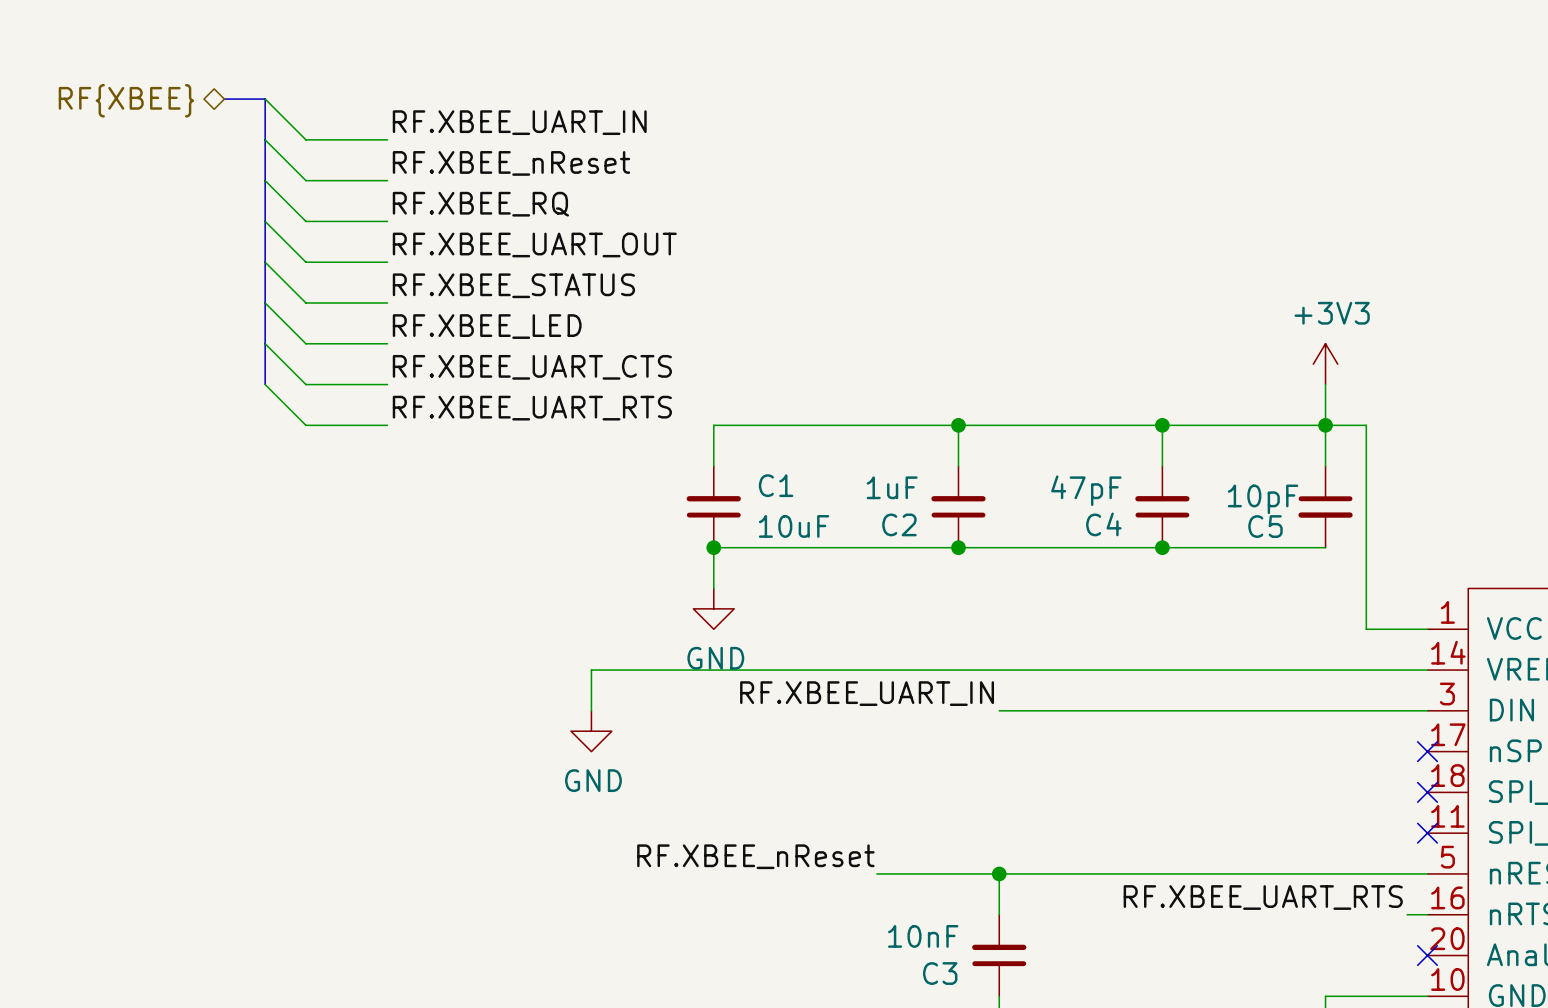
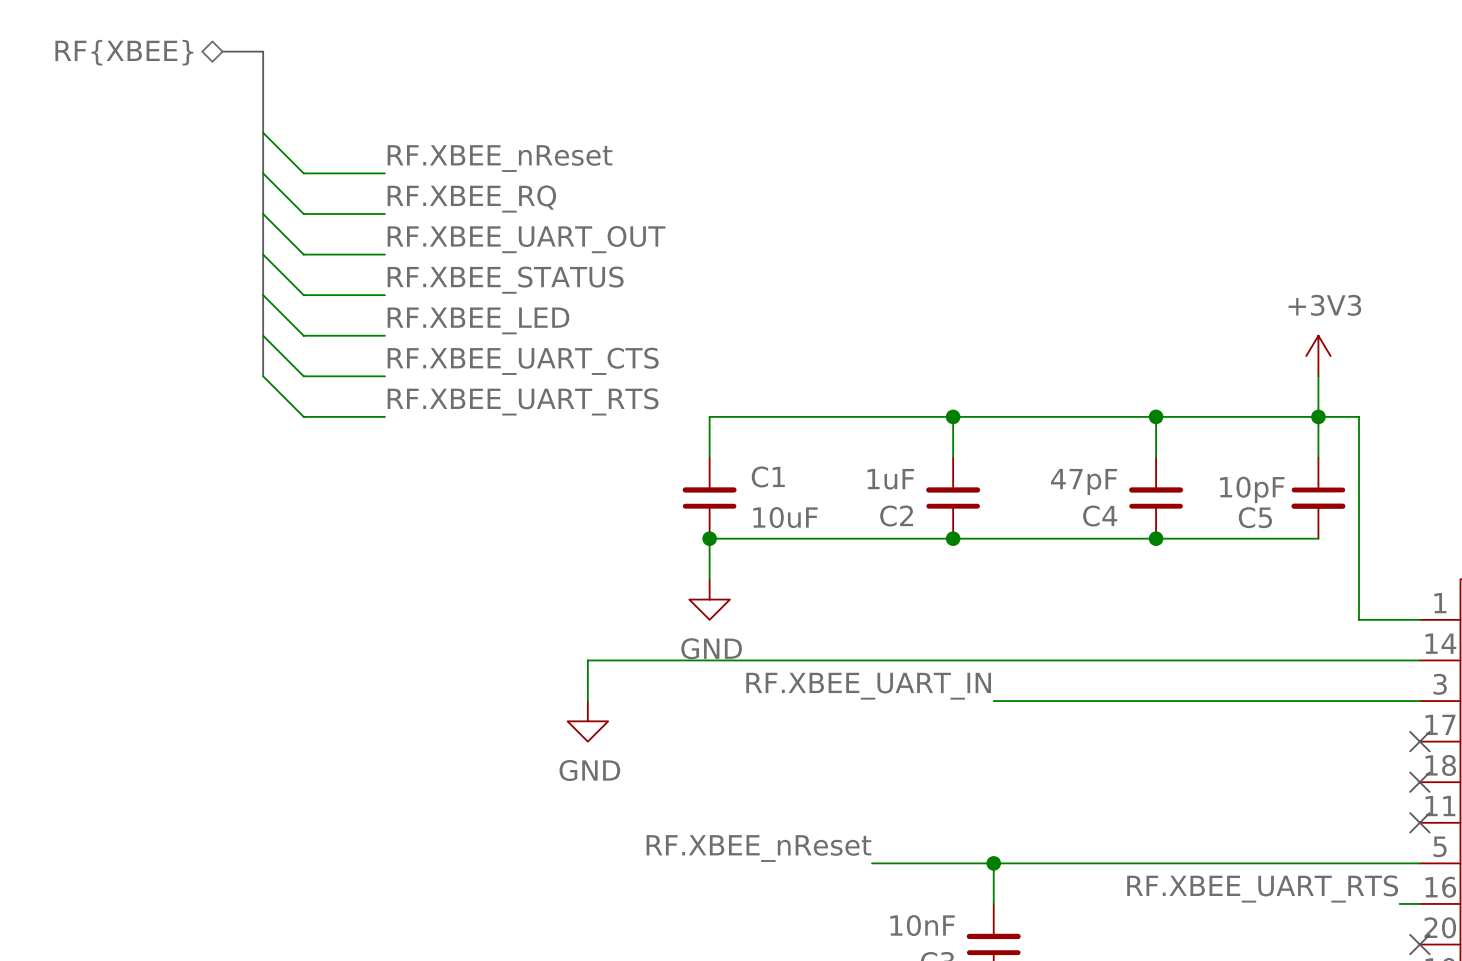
bus: (224, 99) (265, 99) -> (222, 51) (263, 51) (263, 92)
wire: (265, 99) (305, 139) (387, 139) -> none
hierarchical label position: RF{XBEE} (126, 100) -> RF{XBEE} (124, 52)
label: RF.XBEE_UART_IN (519, 122) -> none

